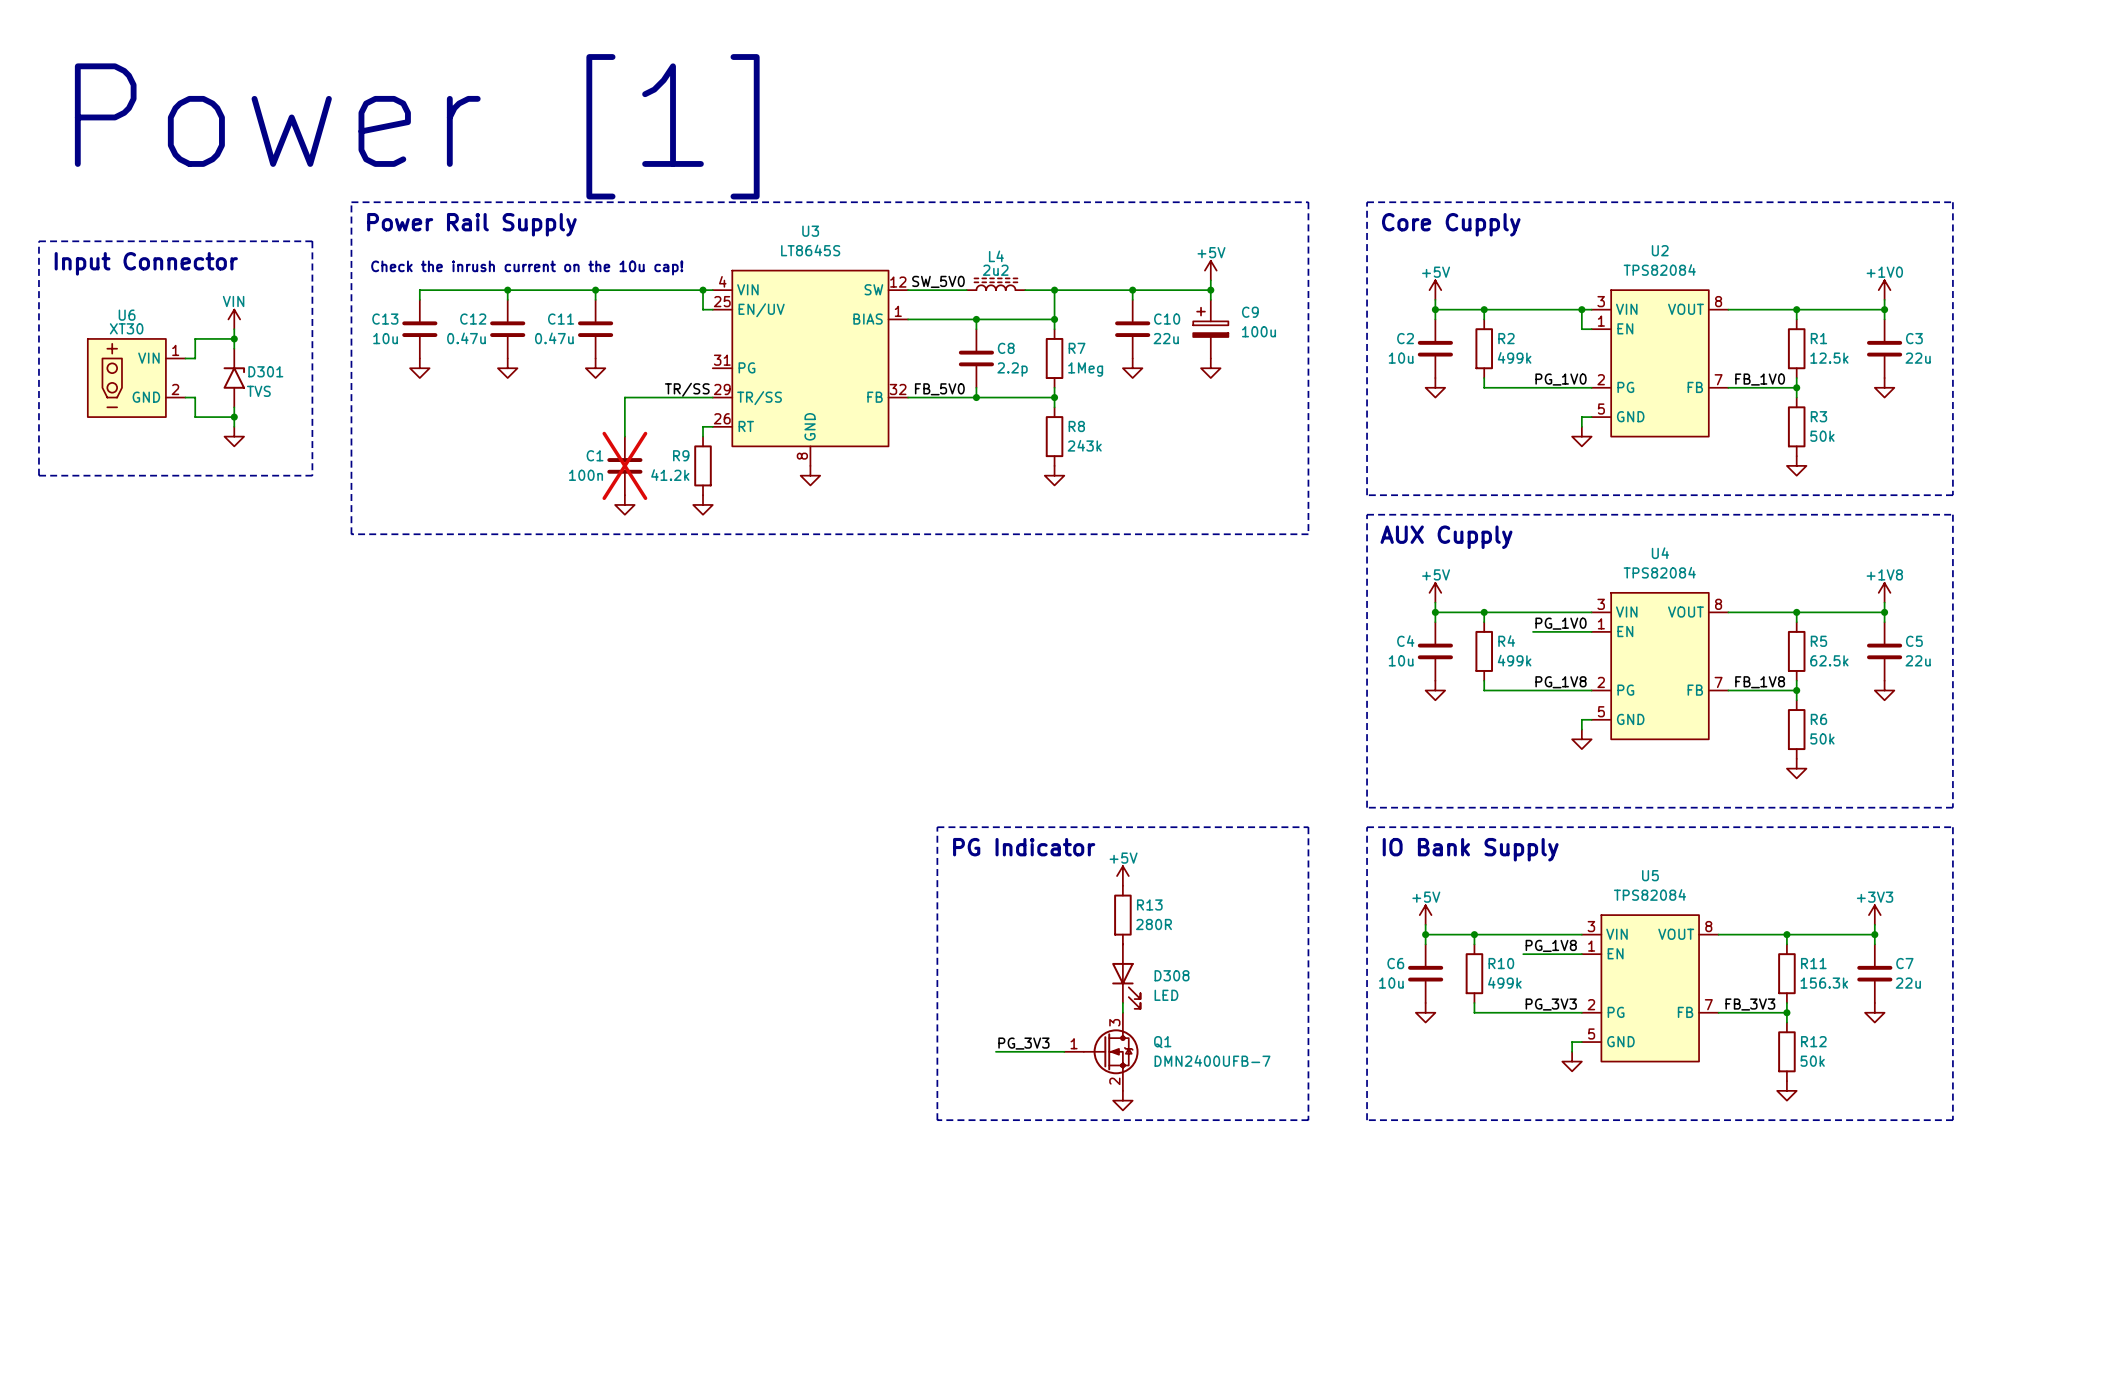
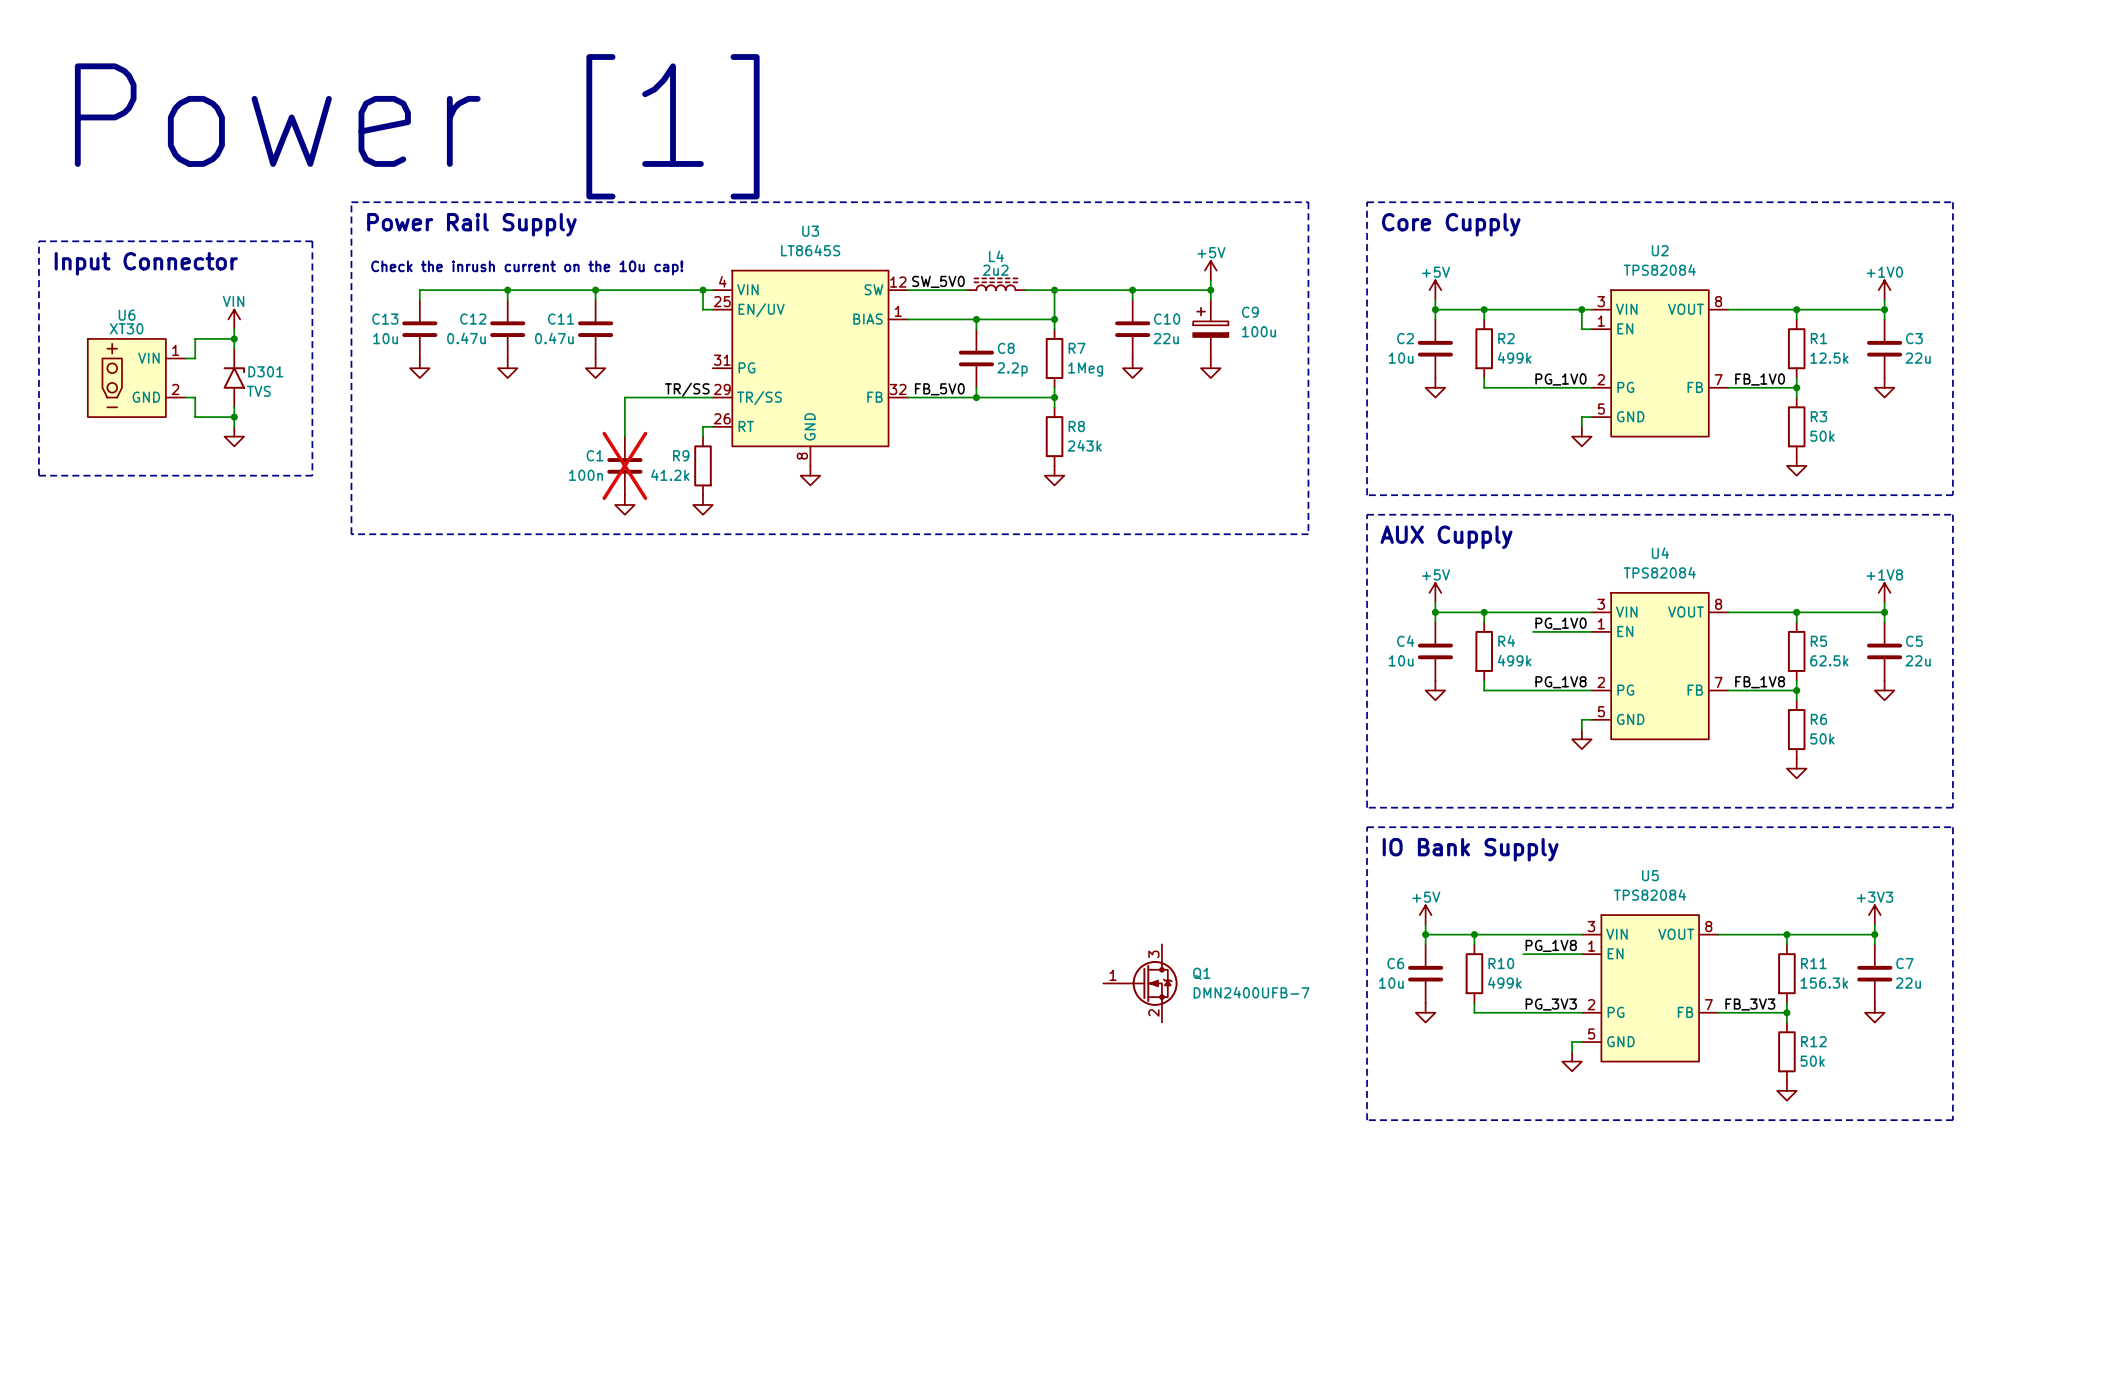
line: (937, 827) (1308, 827) (1308, 1120) (937, 1120) (937, 827) -> none
text: PG Indicator (1024, 847) -> none
power symbol: +5V (1122, 876) -> none
R13: 280R (1122, 915) -> none
D308: LED (1126, 976) -> none
wire: (1122, 1002) (1122, 1012) -> none
label: PG_3V3 (1023, 1043) -> none
wire: (995, 1051) (1064, 1051) -> none
Q1 position: (1101, 1051) -> (1140, 983)
power symbol: (1122, 1100) -> none

